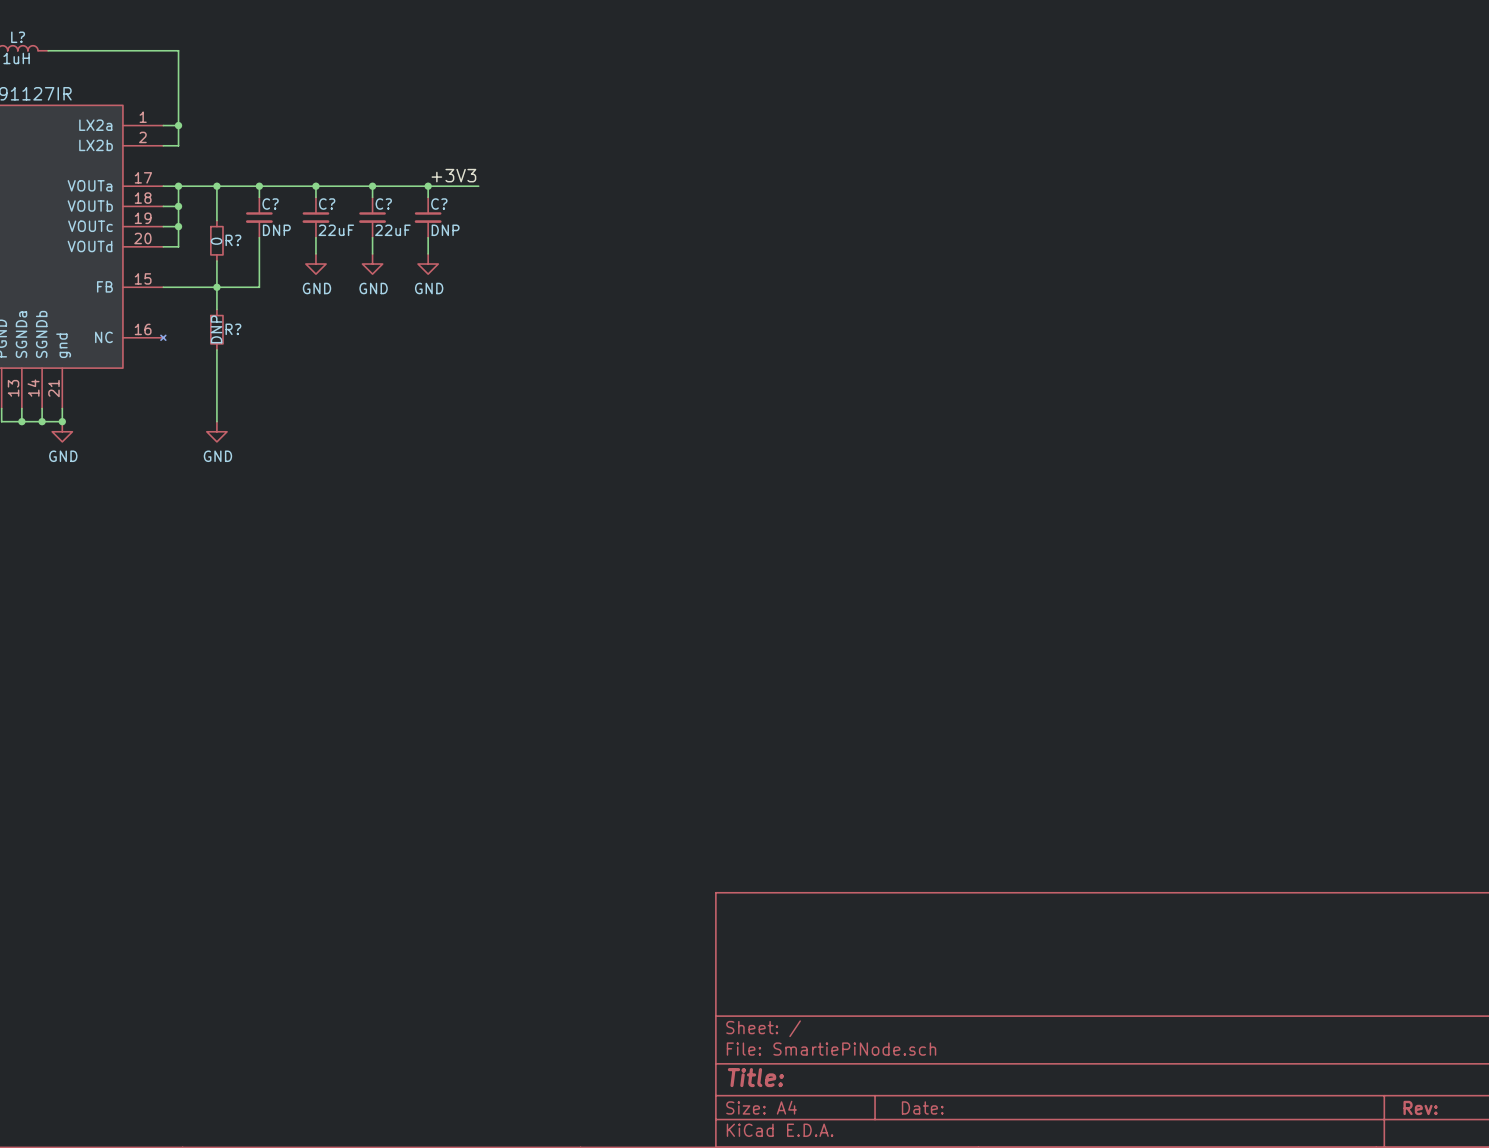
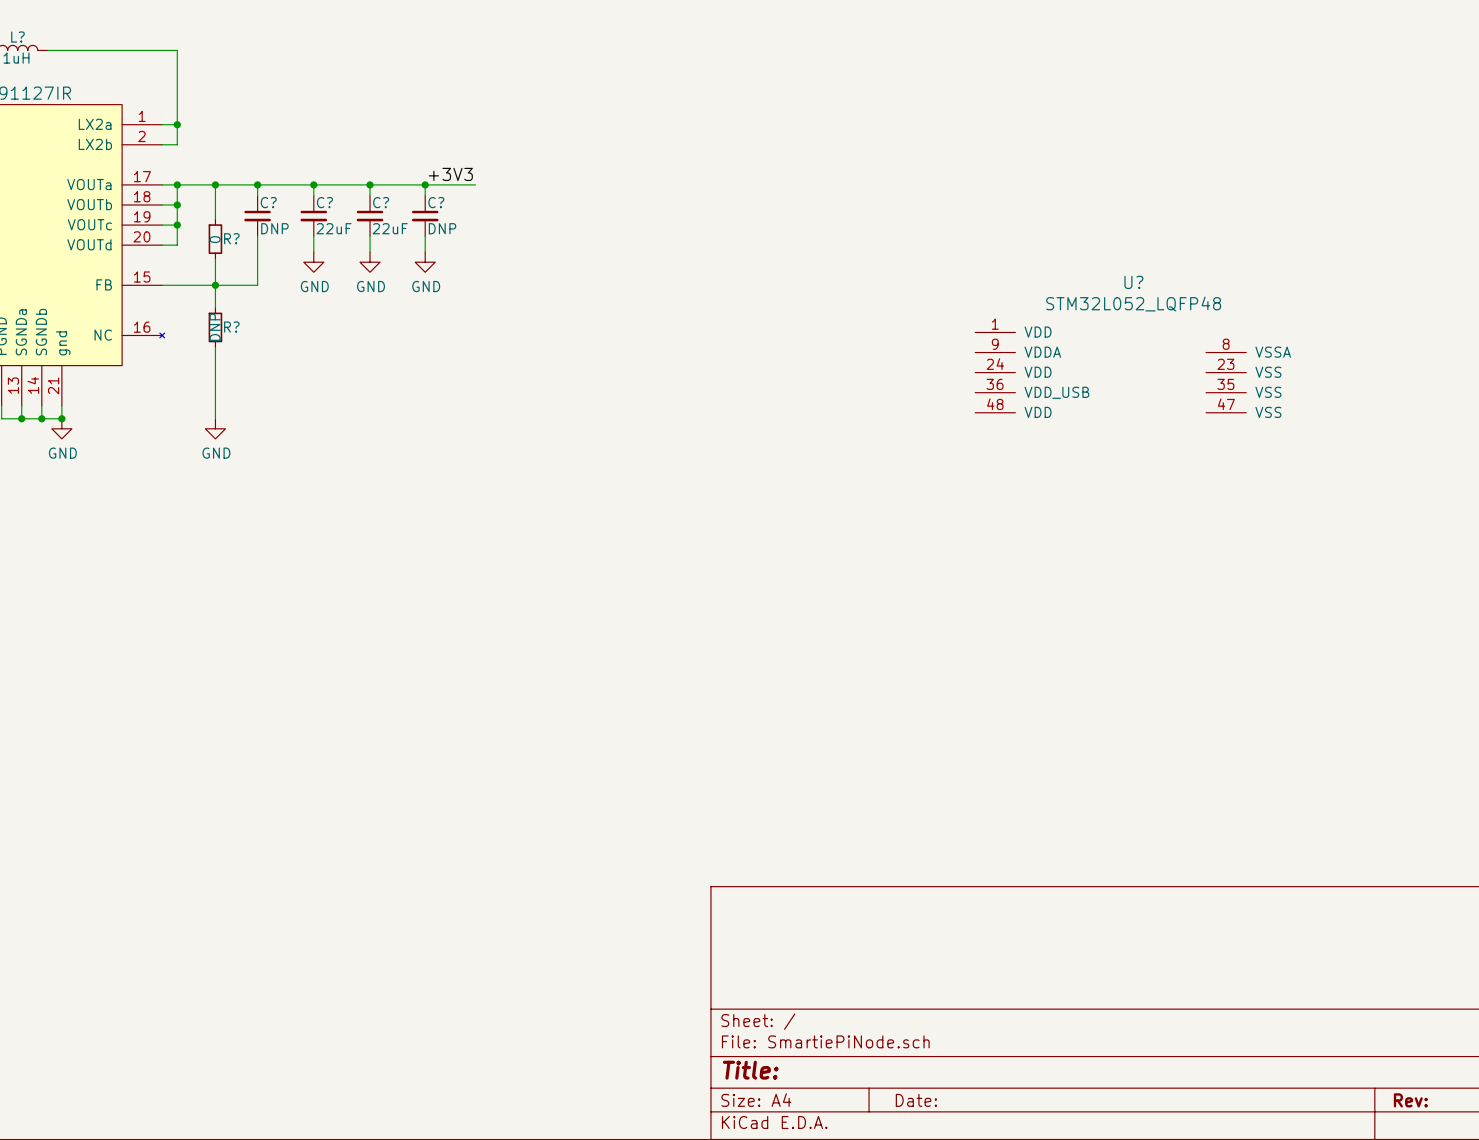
U?: none -> STM32L052_LQFP48 (1110, 372)

